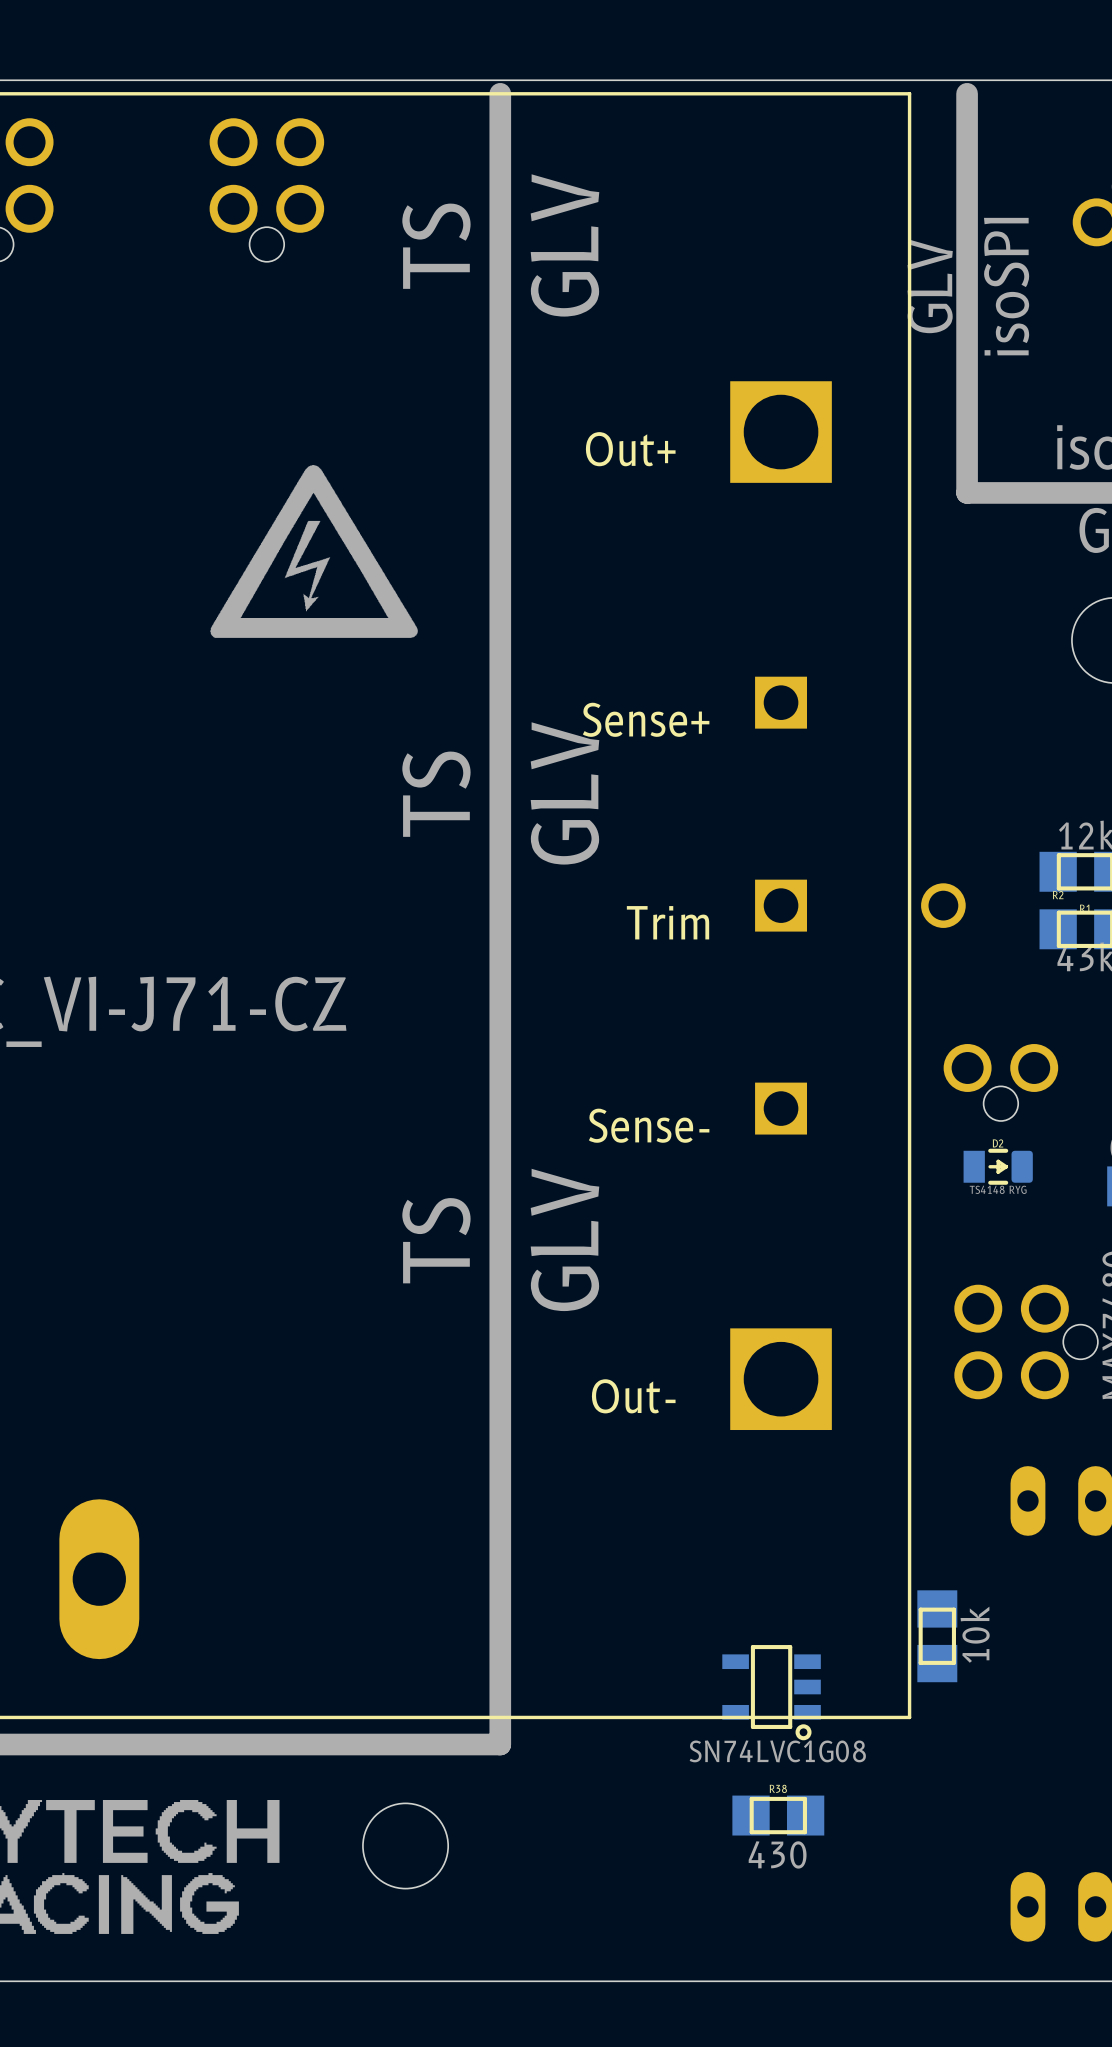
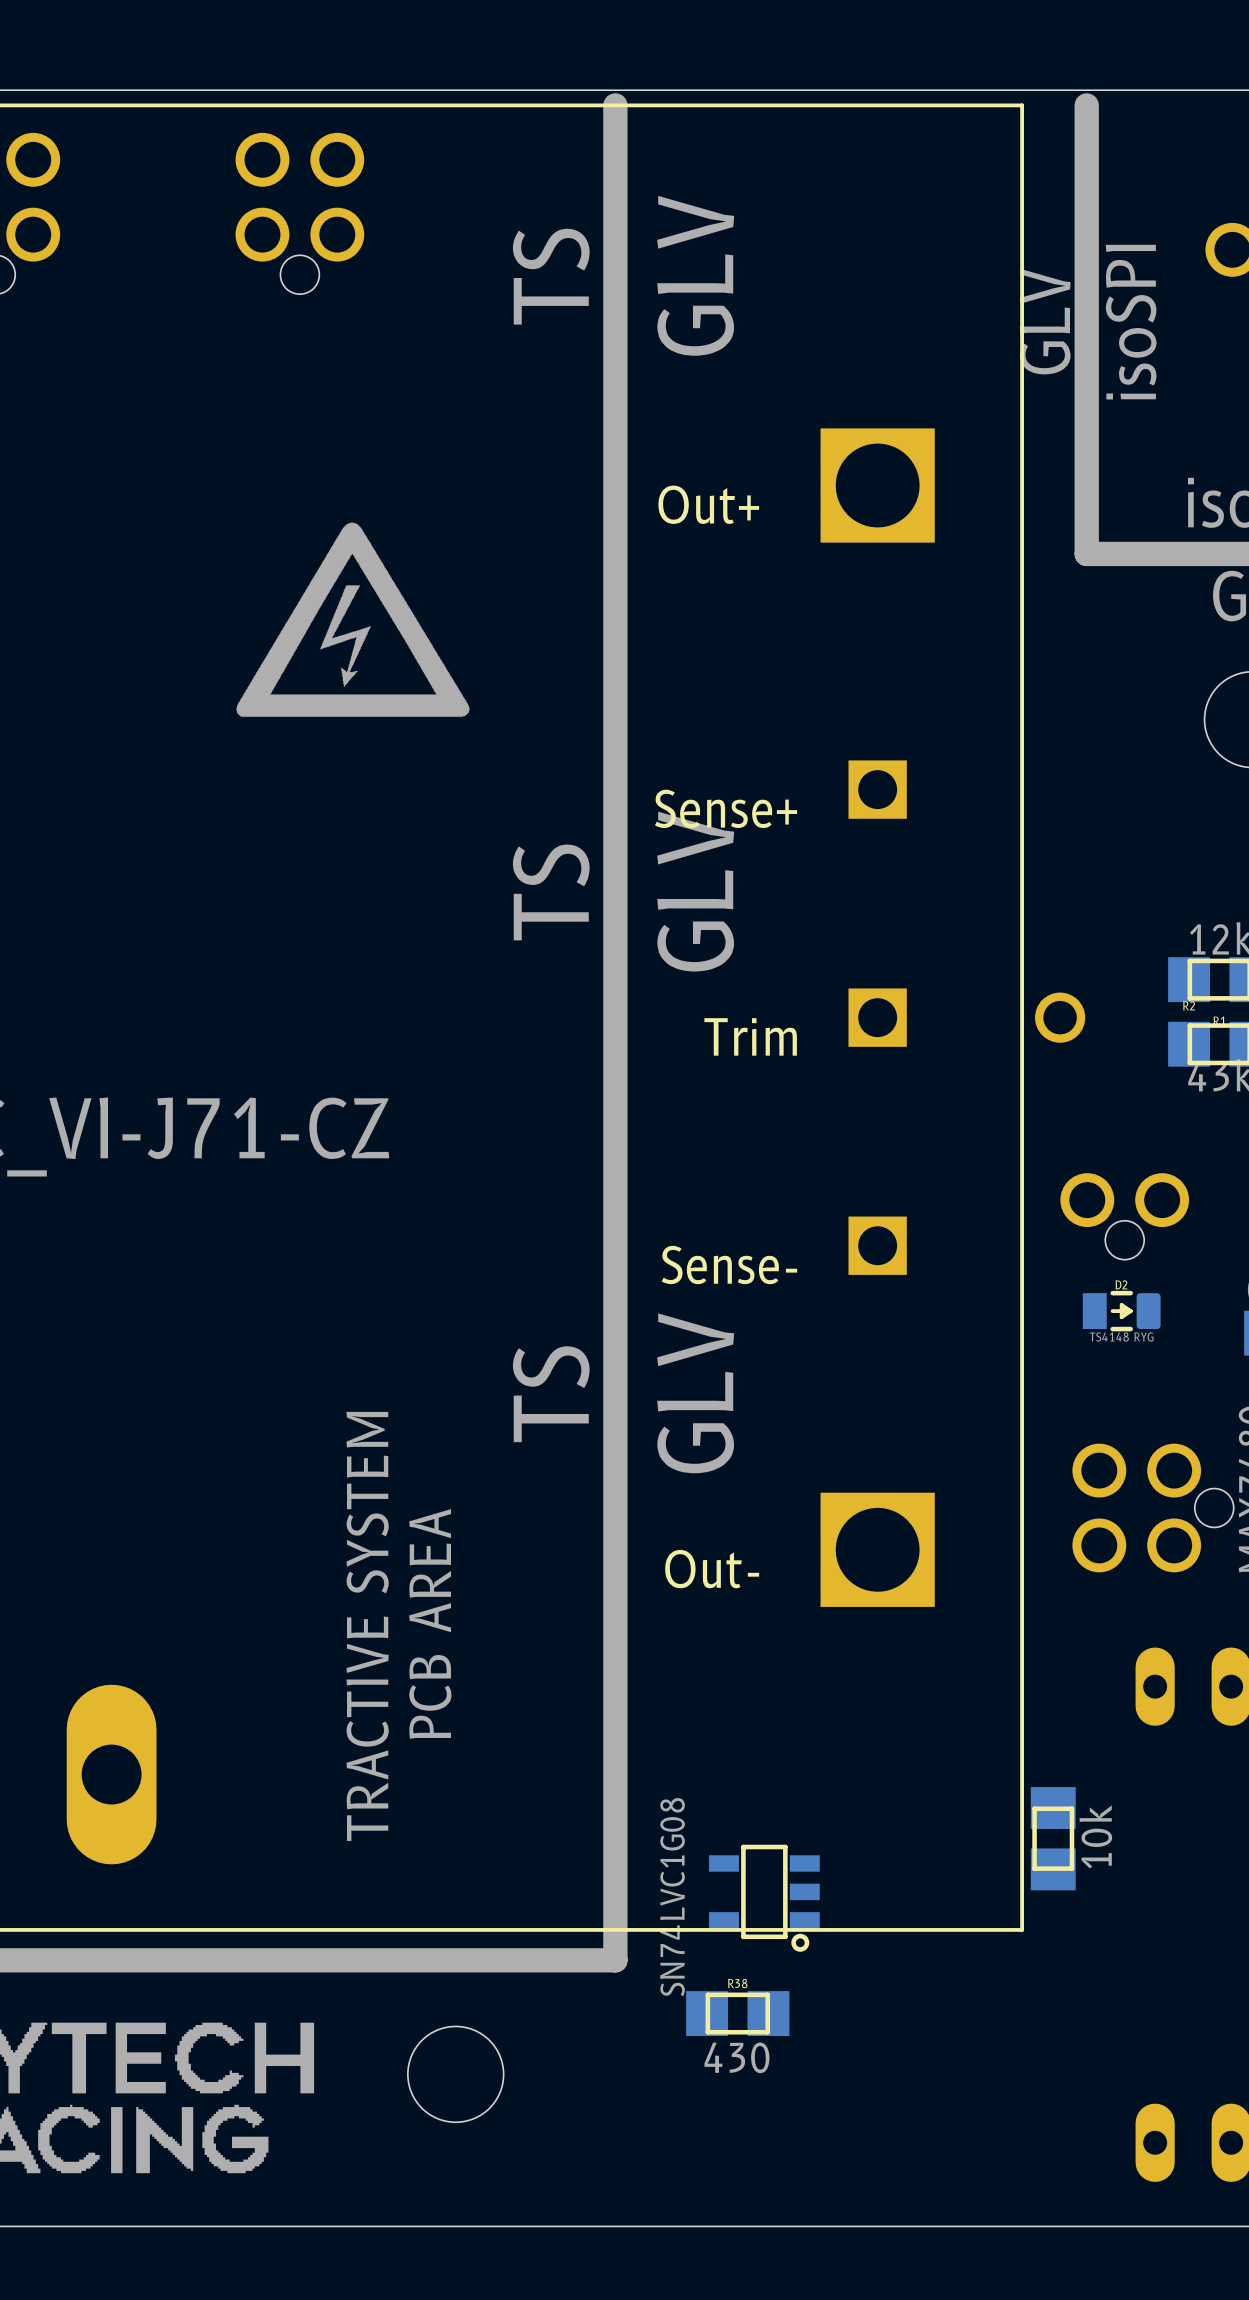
line: (500, 93) (500, 1744) -> (615, 105) (615, 1960) (562, 1960)
text position: GLV (564, 245) -> GLV (695, 275)
text position: TS (436, 246) -> TS (551, 276)
text position: GLV (564, 793) -> GLV (695, 891)
text position: TS (436, 794) -> TS (551, 892)
text position: GLV (564, 1239) -> GLV (695, 1393)
text position: TS (436, 1240) -> TS (551, 1394)
text: none -> PCB AREA (430, 1623)
text: none -> TRACTIVE SYSTEM (367, 1626)
part position: (771, 1692) -> (764, 1898)
text rotation: 0° (777, 1751) -> 90° counterclockwise (672, 1897)
R38 position: (778, 1815) -> (737, 2013)

